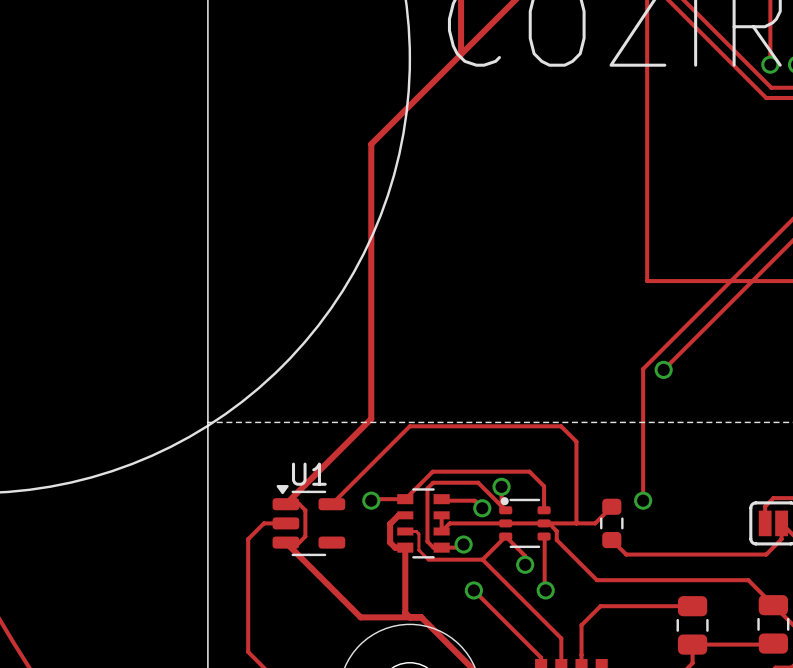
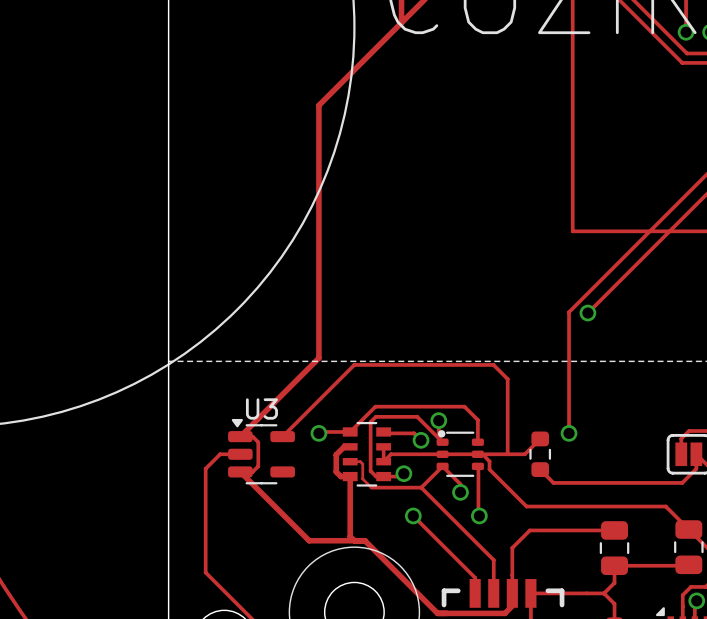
U1 name: U1 (309, 474) -> U3 (261, 408)

